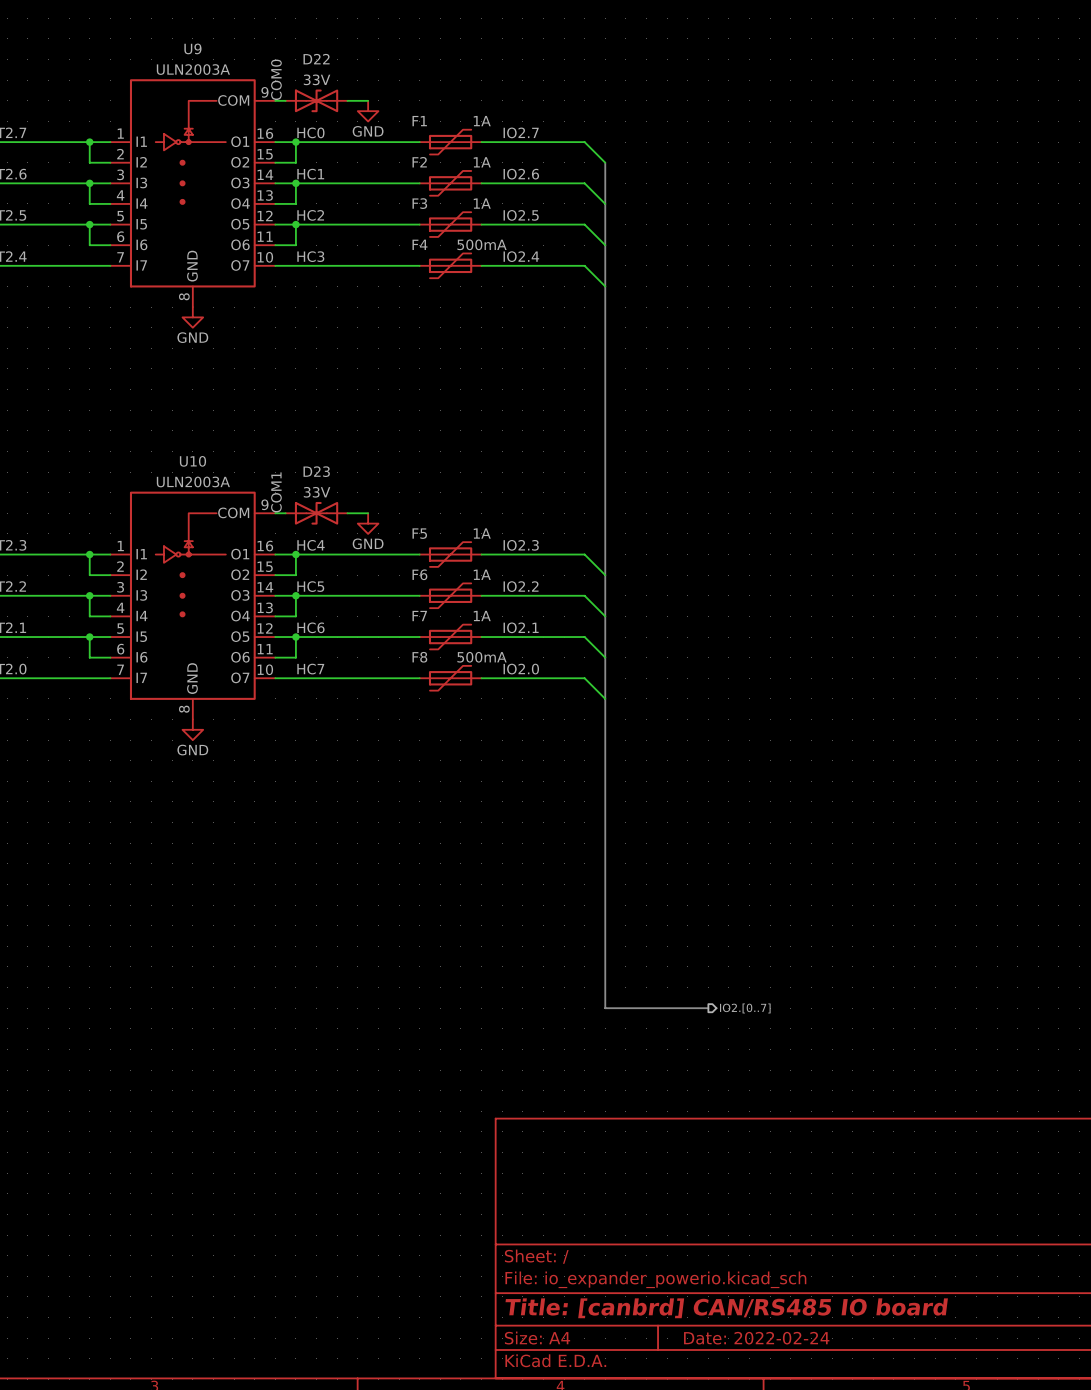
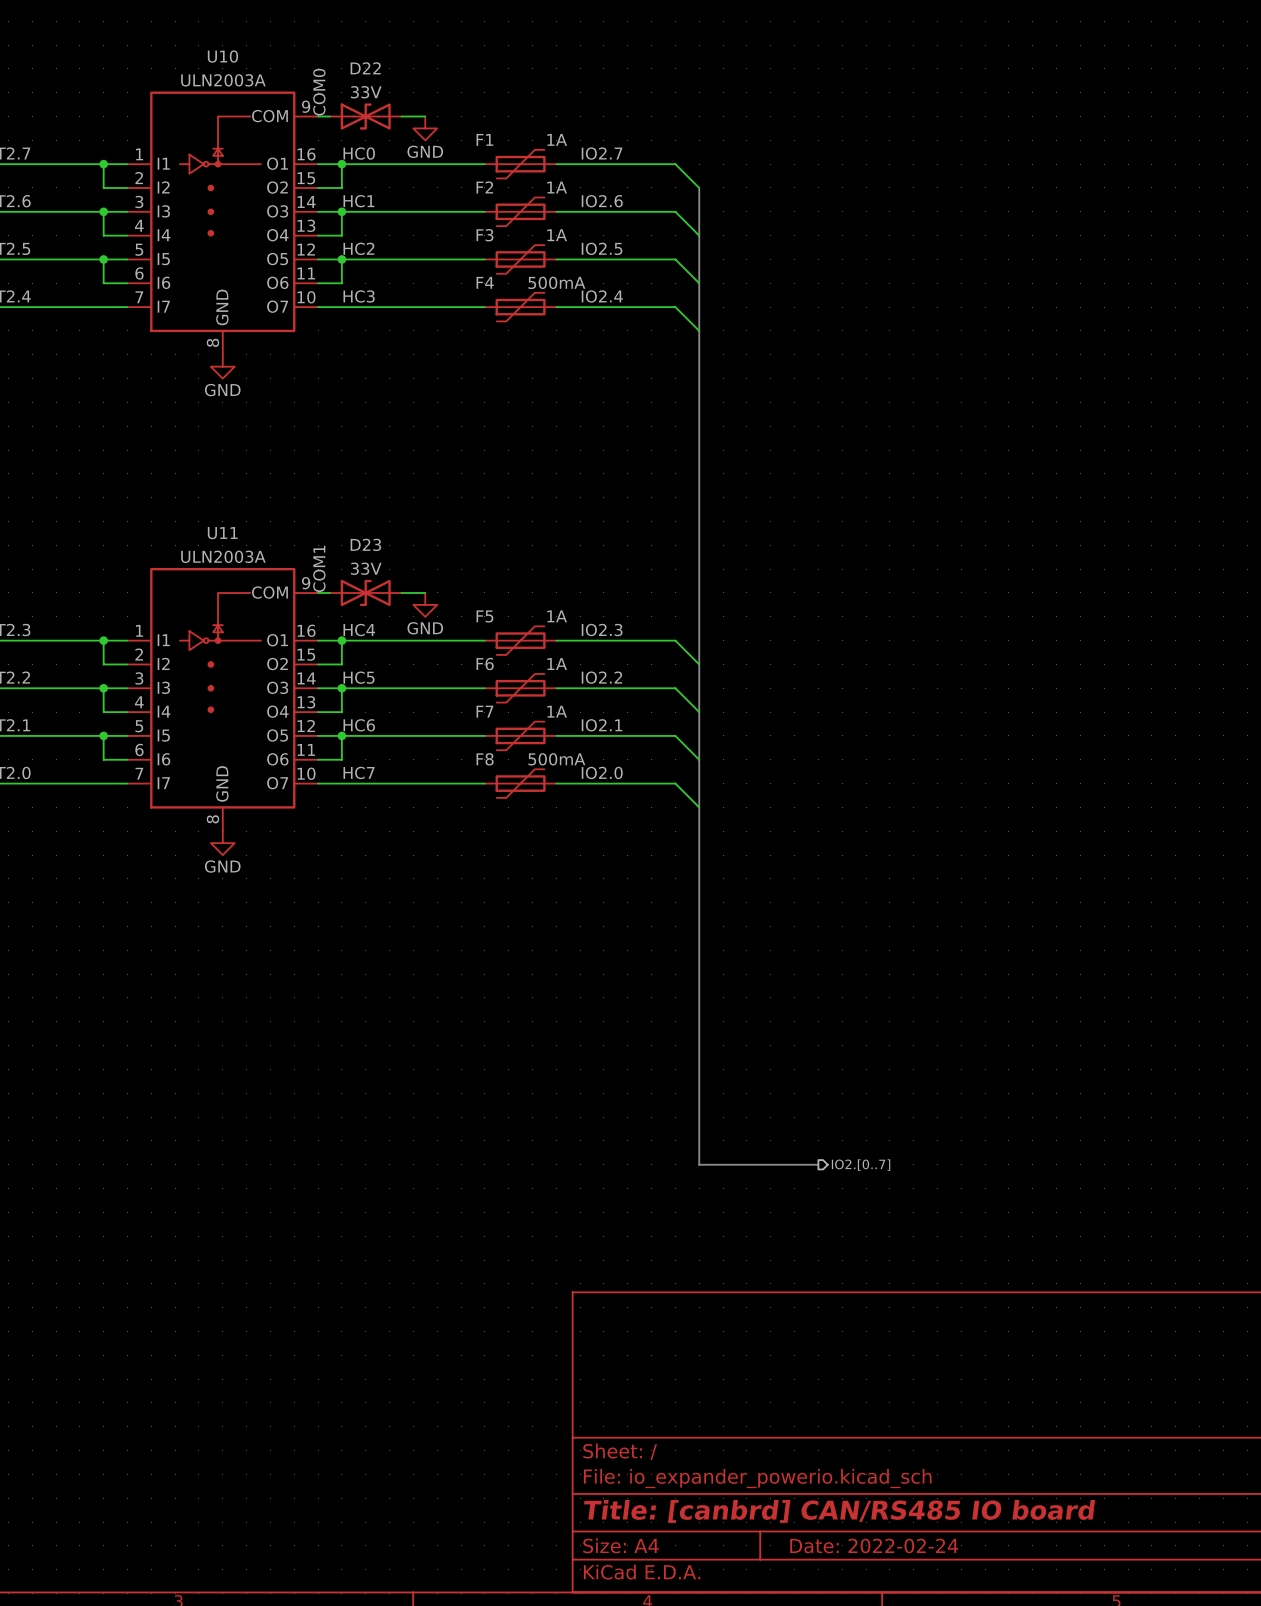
U9 name: U9 (192, 48) -> U10 (222, 56)
U10 name: U10 (192, 461) -> U11 (222, 533)

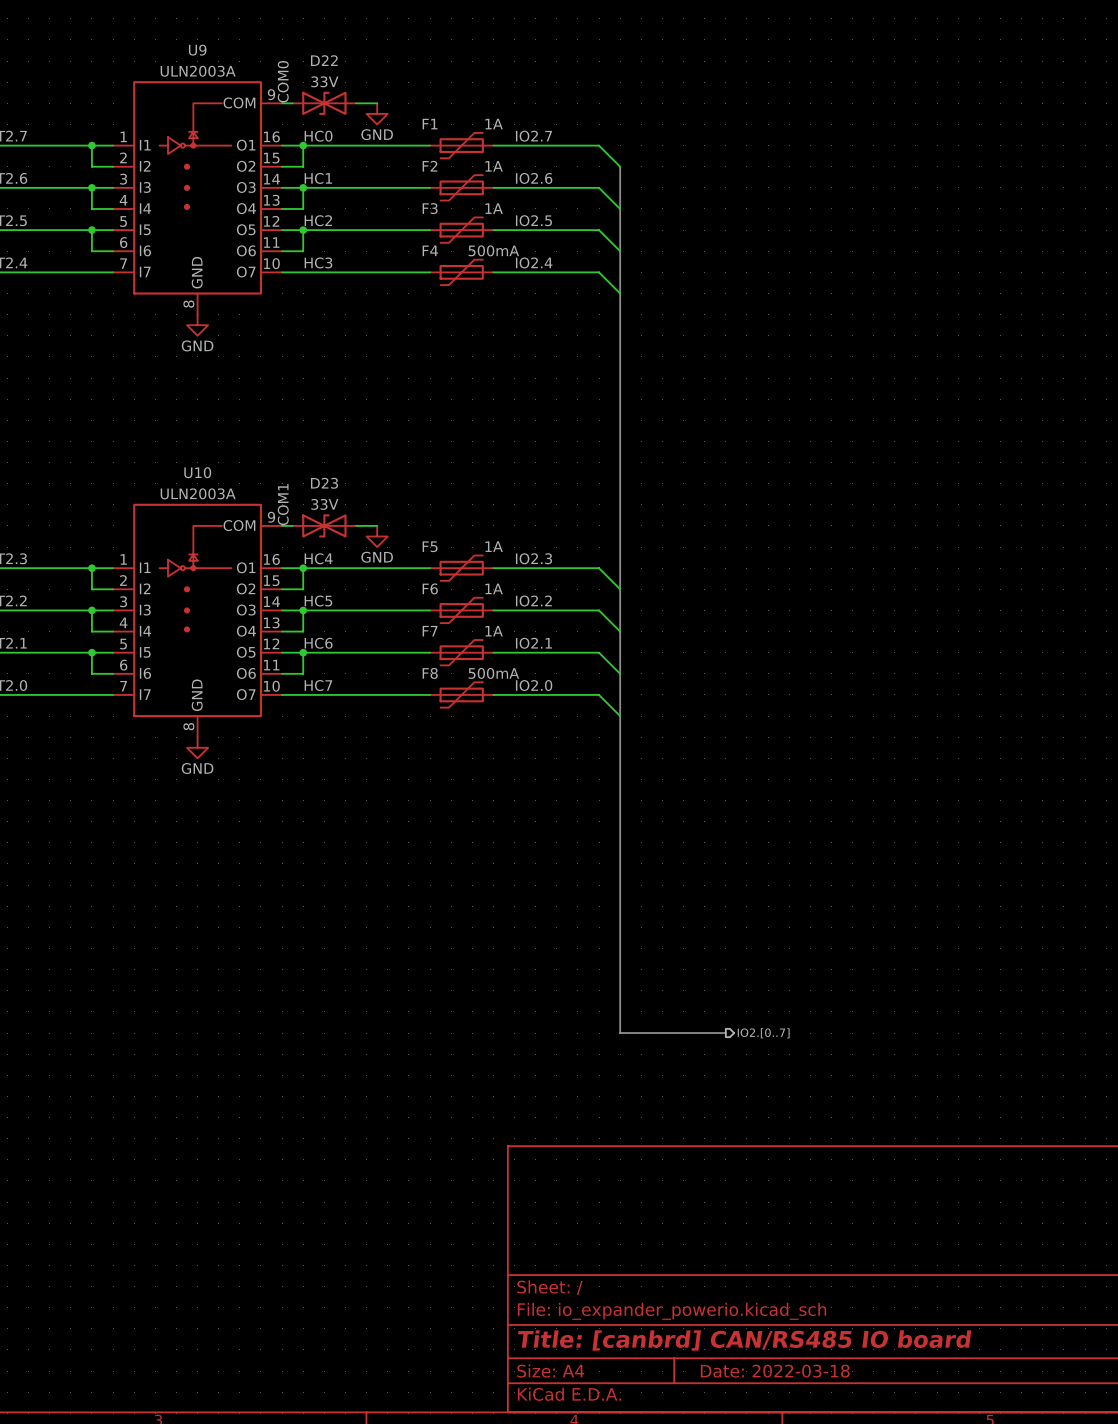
U10 name: U10 (222, 56) -> U9 (197, 50)
U11 name: U11 (222, 533) -> U10 (197, 472)
title block: Date: 2022-02-24 (874, 1545) -> Date: 2022-03-18 (775, 1371)

